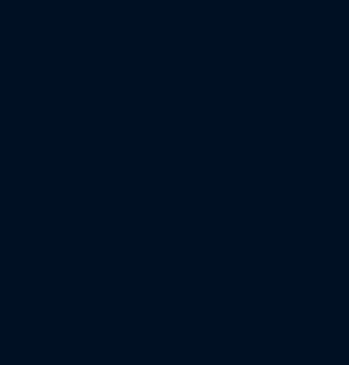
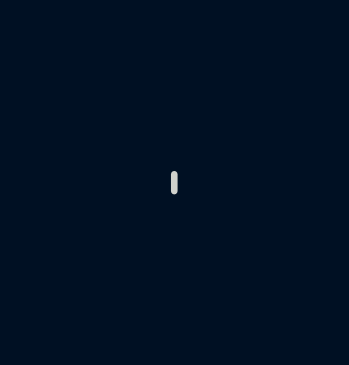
board edge: none -> (174, 174) (174, 191)

